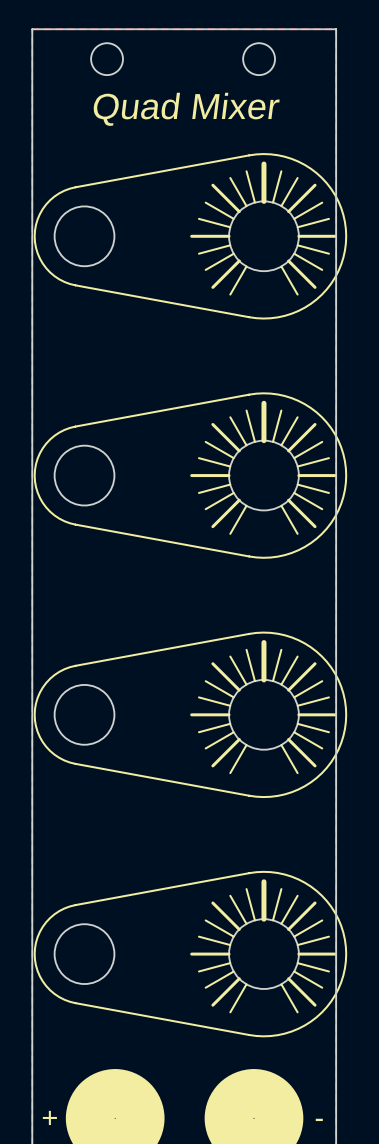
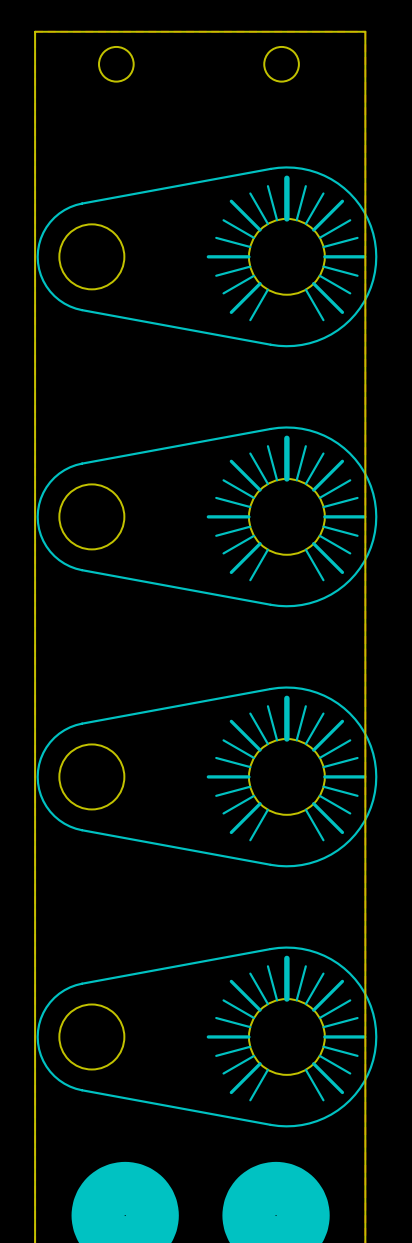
text: Quad Mixer (186, 109) -> none
text: + (49, 1117) -> none
text: - (319, 1119) -> none

